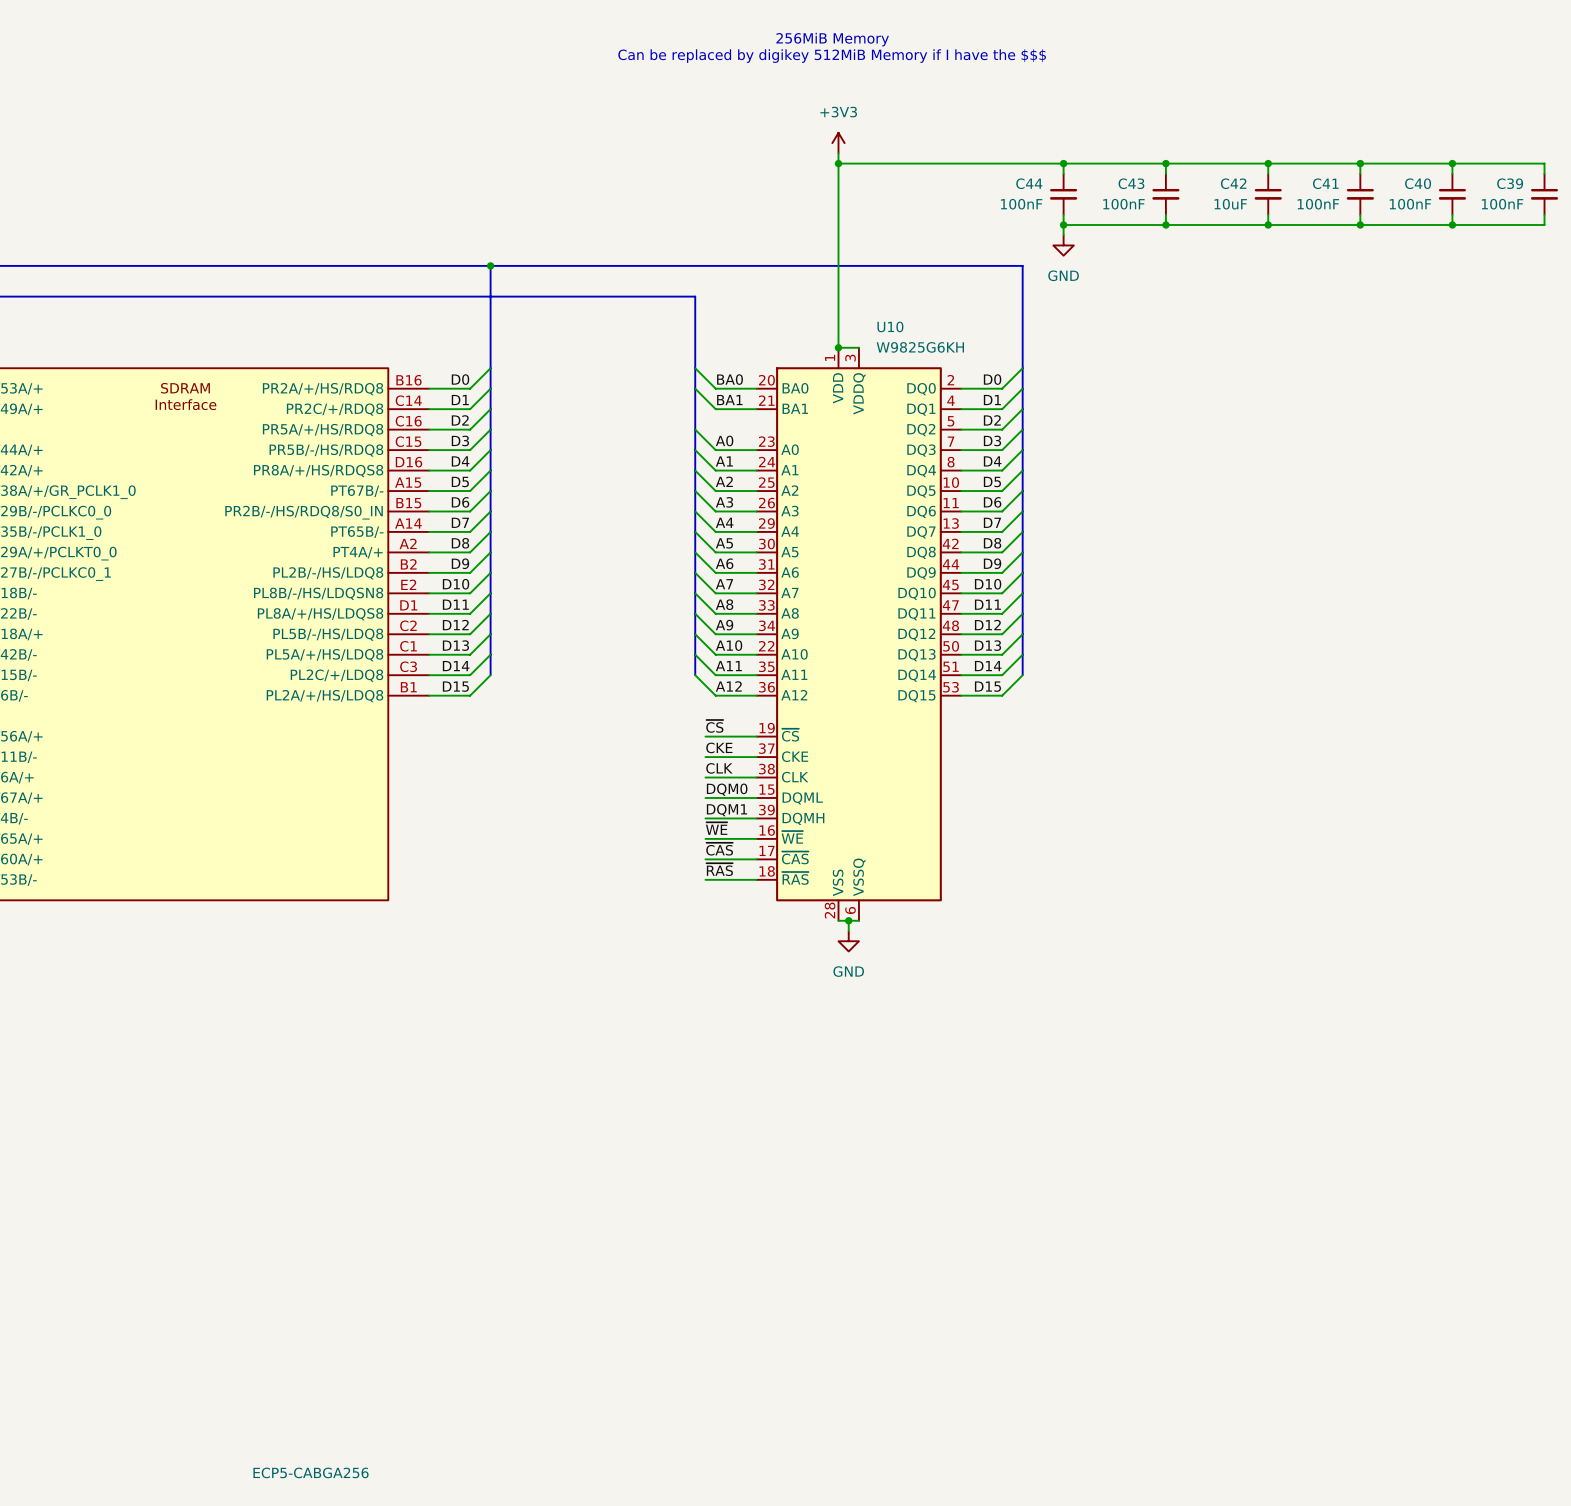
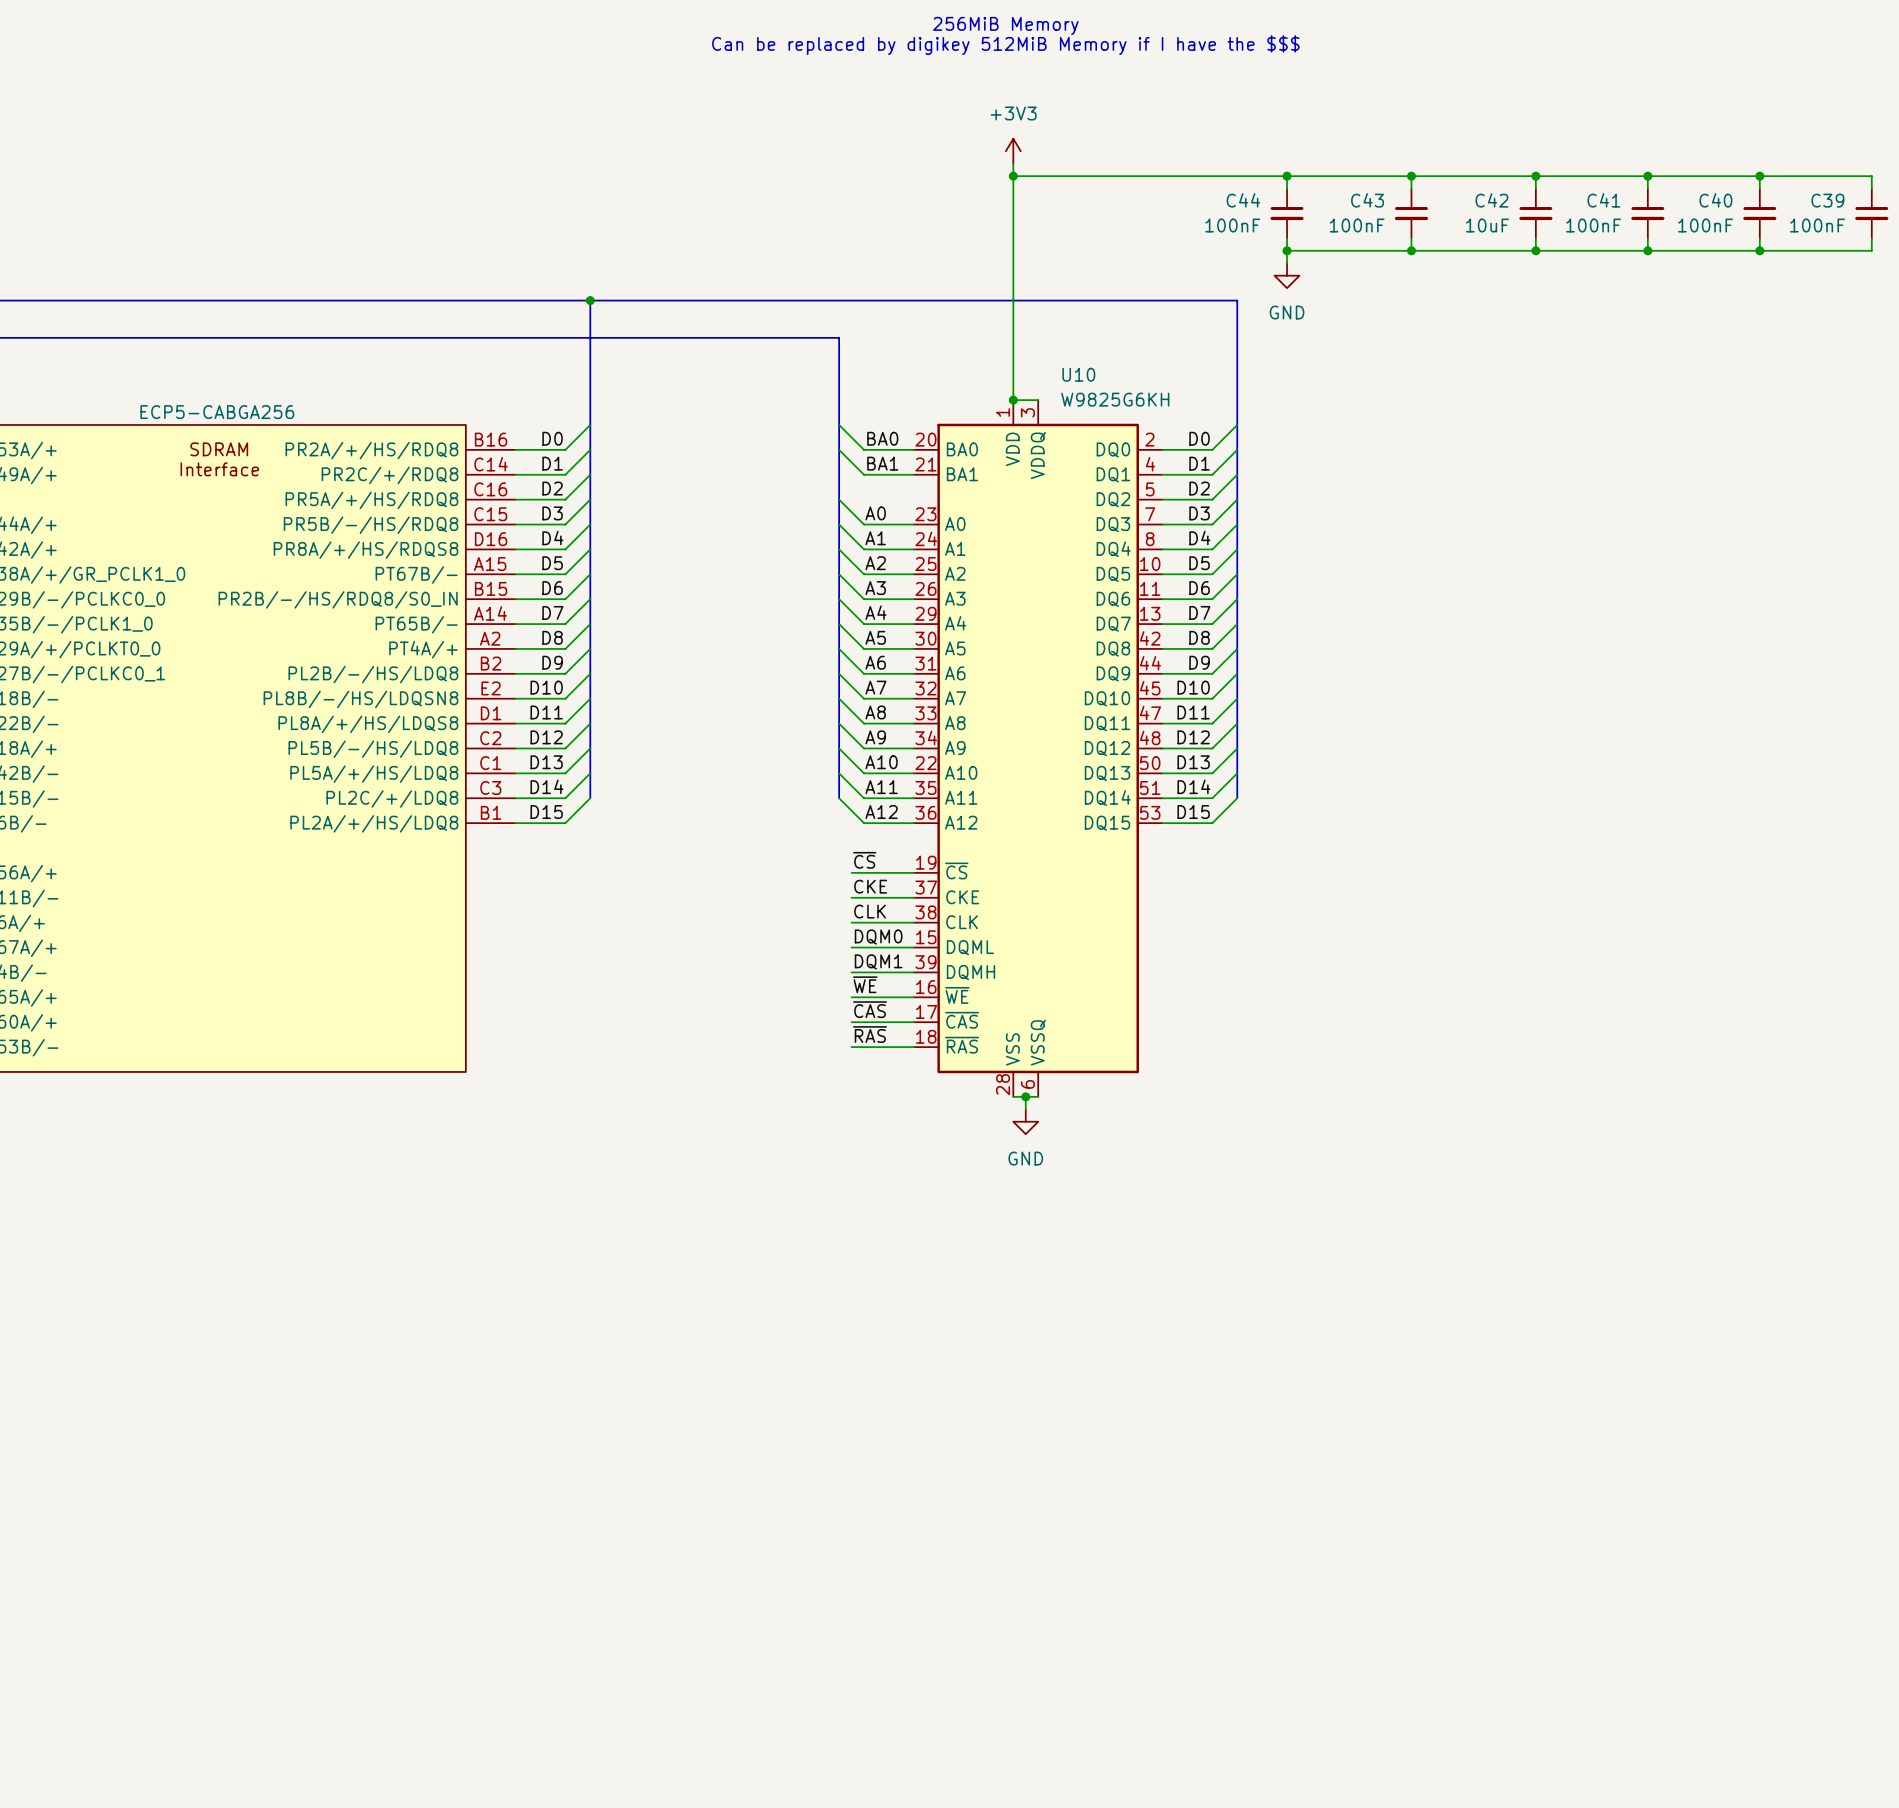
part value position: ECP5-CABGA256 (311, 1472) -> ECP5-CABGA256 (217, 412)

